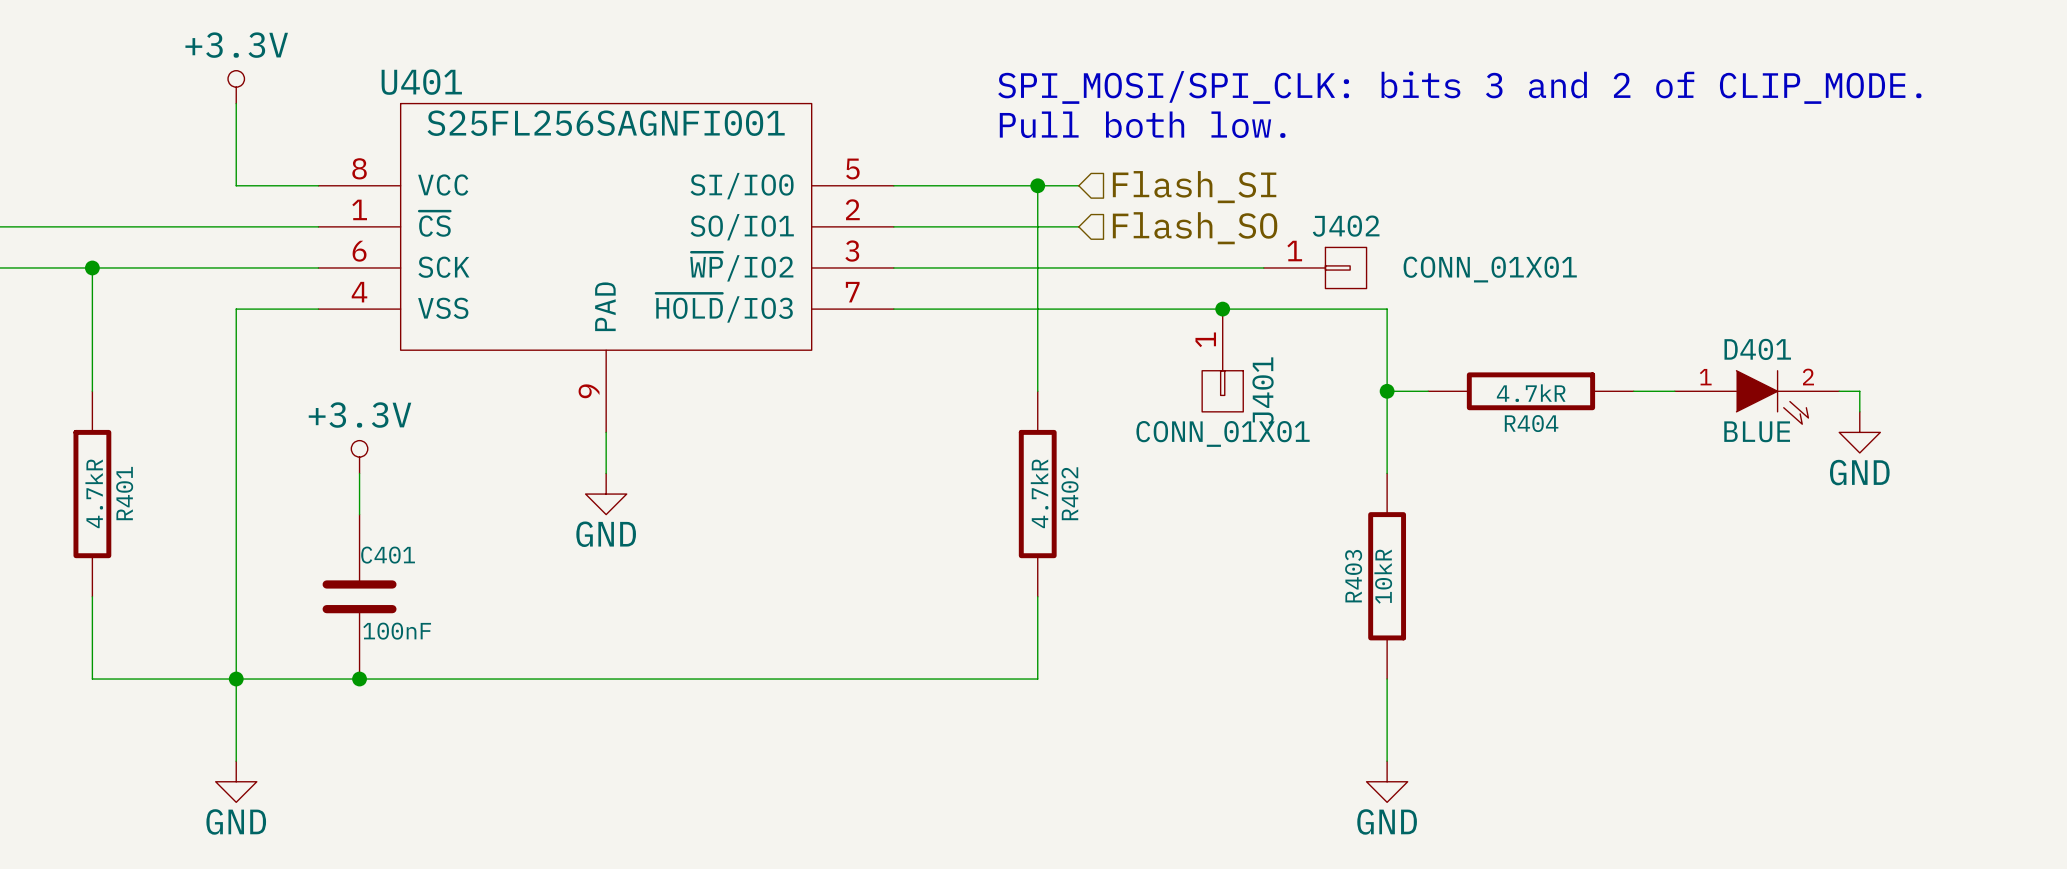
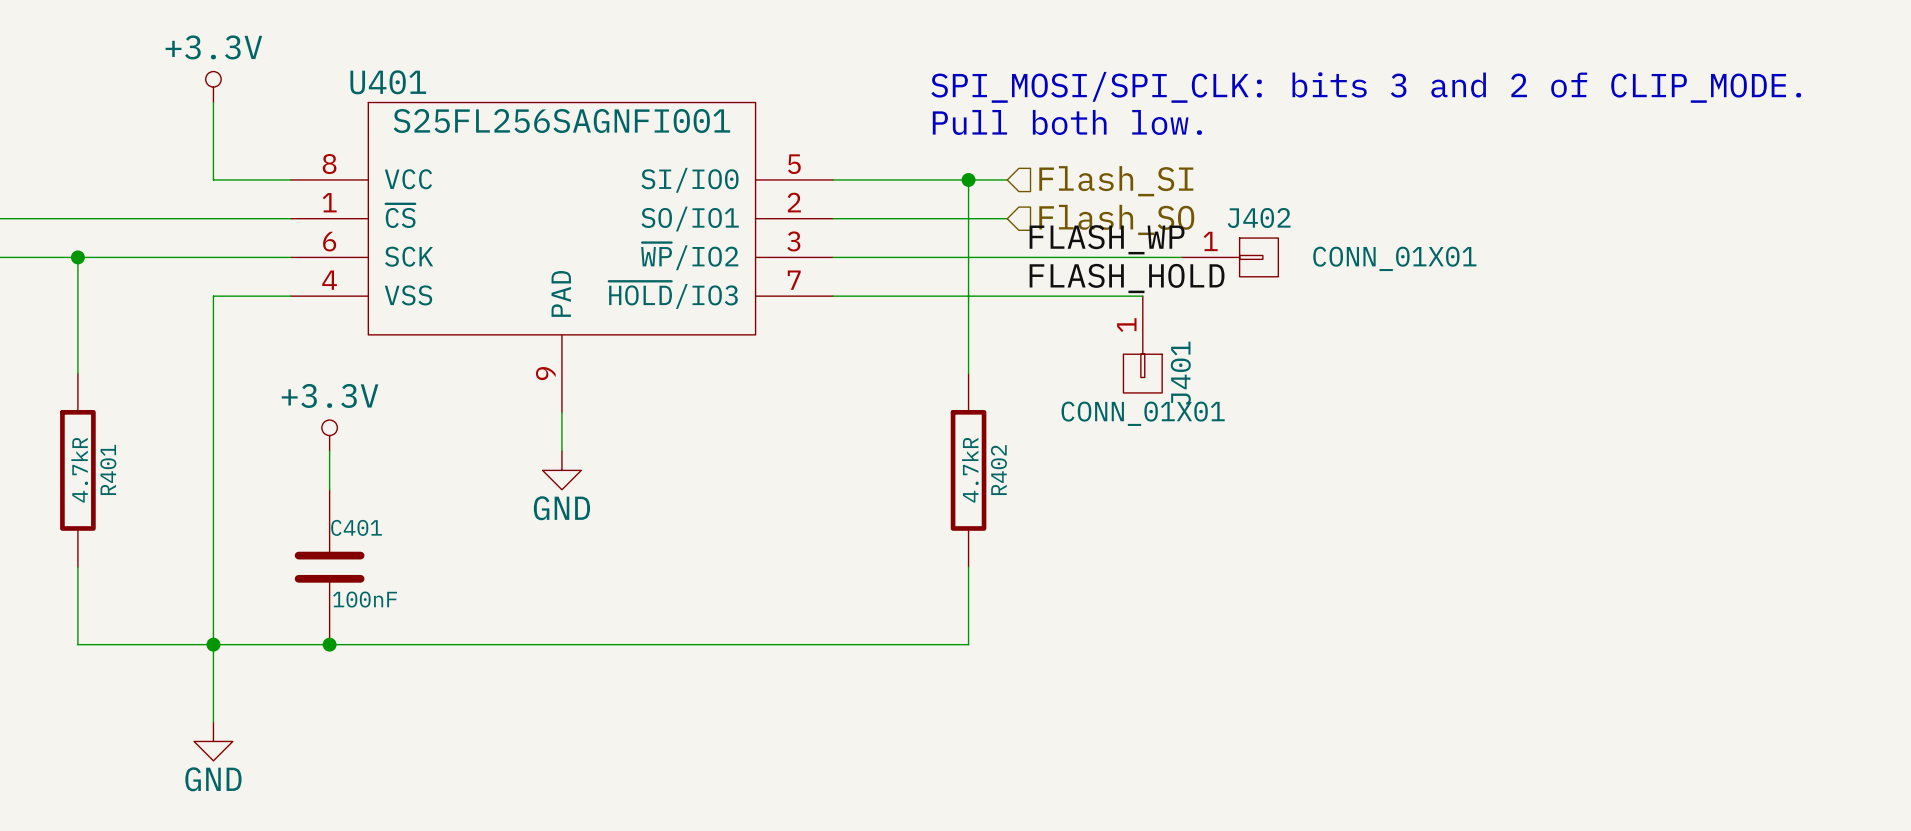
label: none -> FLASH_WP (1107, 239)
label: none -> FLASH_HOLD (1127, 278)
wire: (1222, 309) (1387, 309) (1387, 473) -> none
junction: (1222, 309) -> none
wire: (1387, 391) (1428, 391) -> none
junction: (1387, 391) -> none
R404: 4.7kR (1530, 391) -> none
wire: (1633, 391) (1674, 391) -> none
wire: (1839, 391) (1859, 391) (1859, 411) -> none
D401: BLUE (1757, 397) -> none
power symbol: GND (1859, 432) -> none
R403: 10kR (1387, 576) -> none
wire: (1387, 679) (1387, 761) -> none
power symbol: GND (1387, 781) -> none

